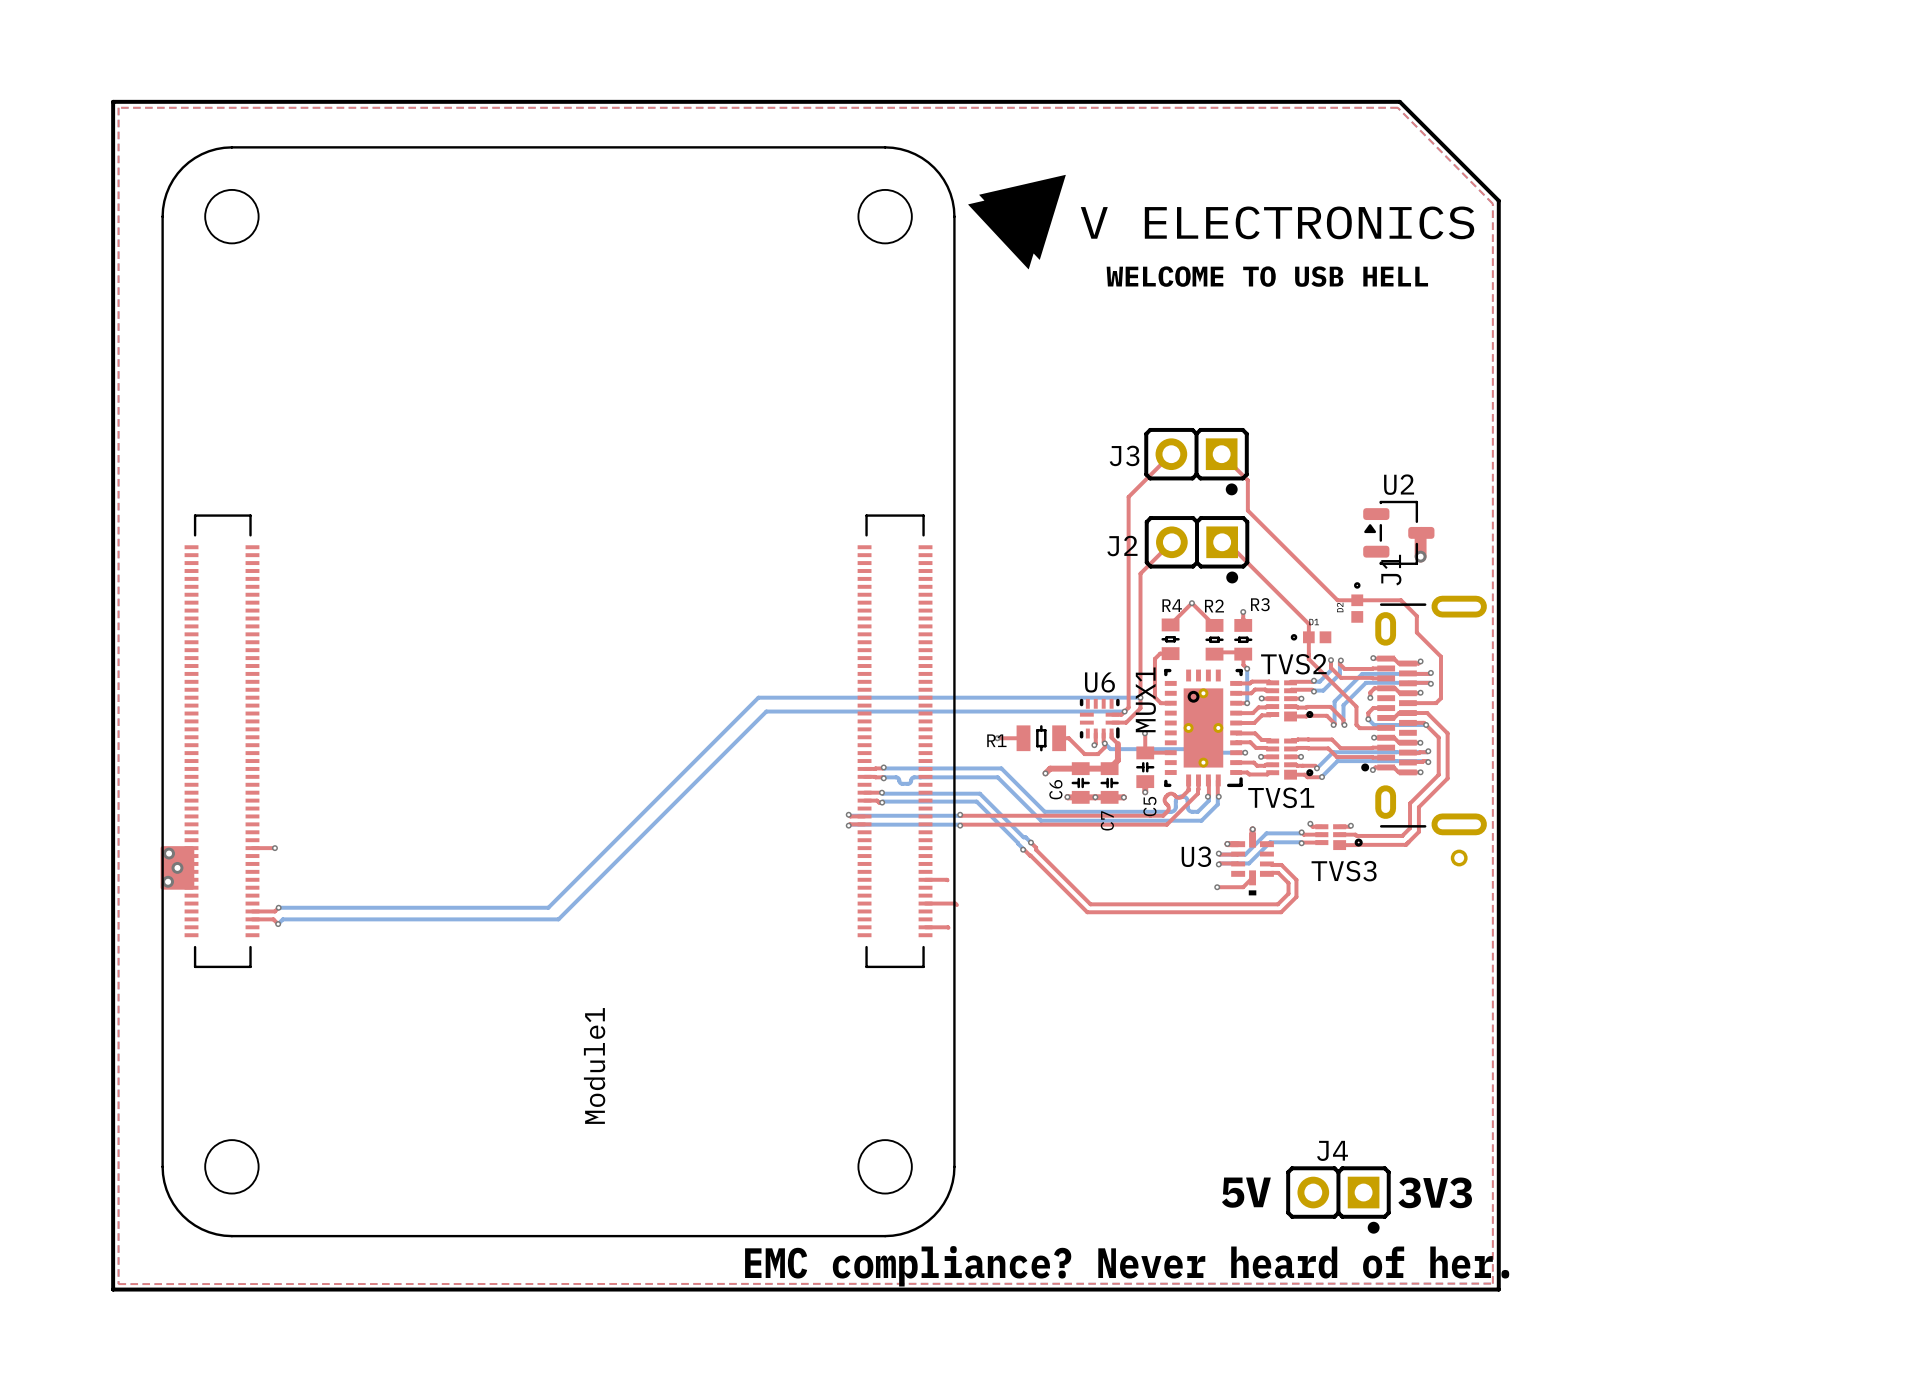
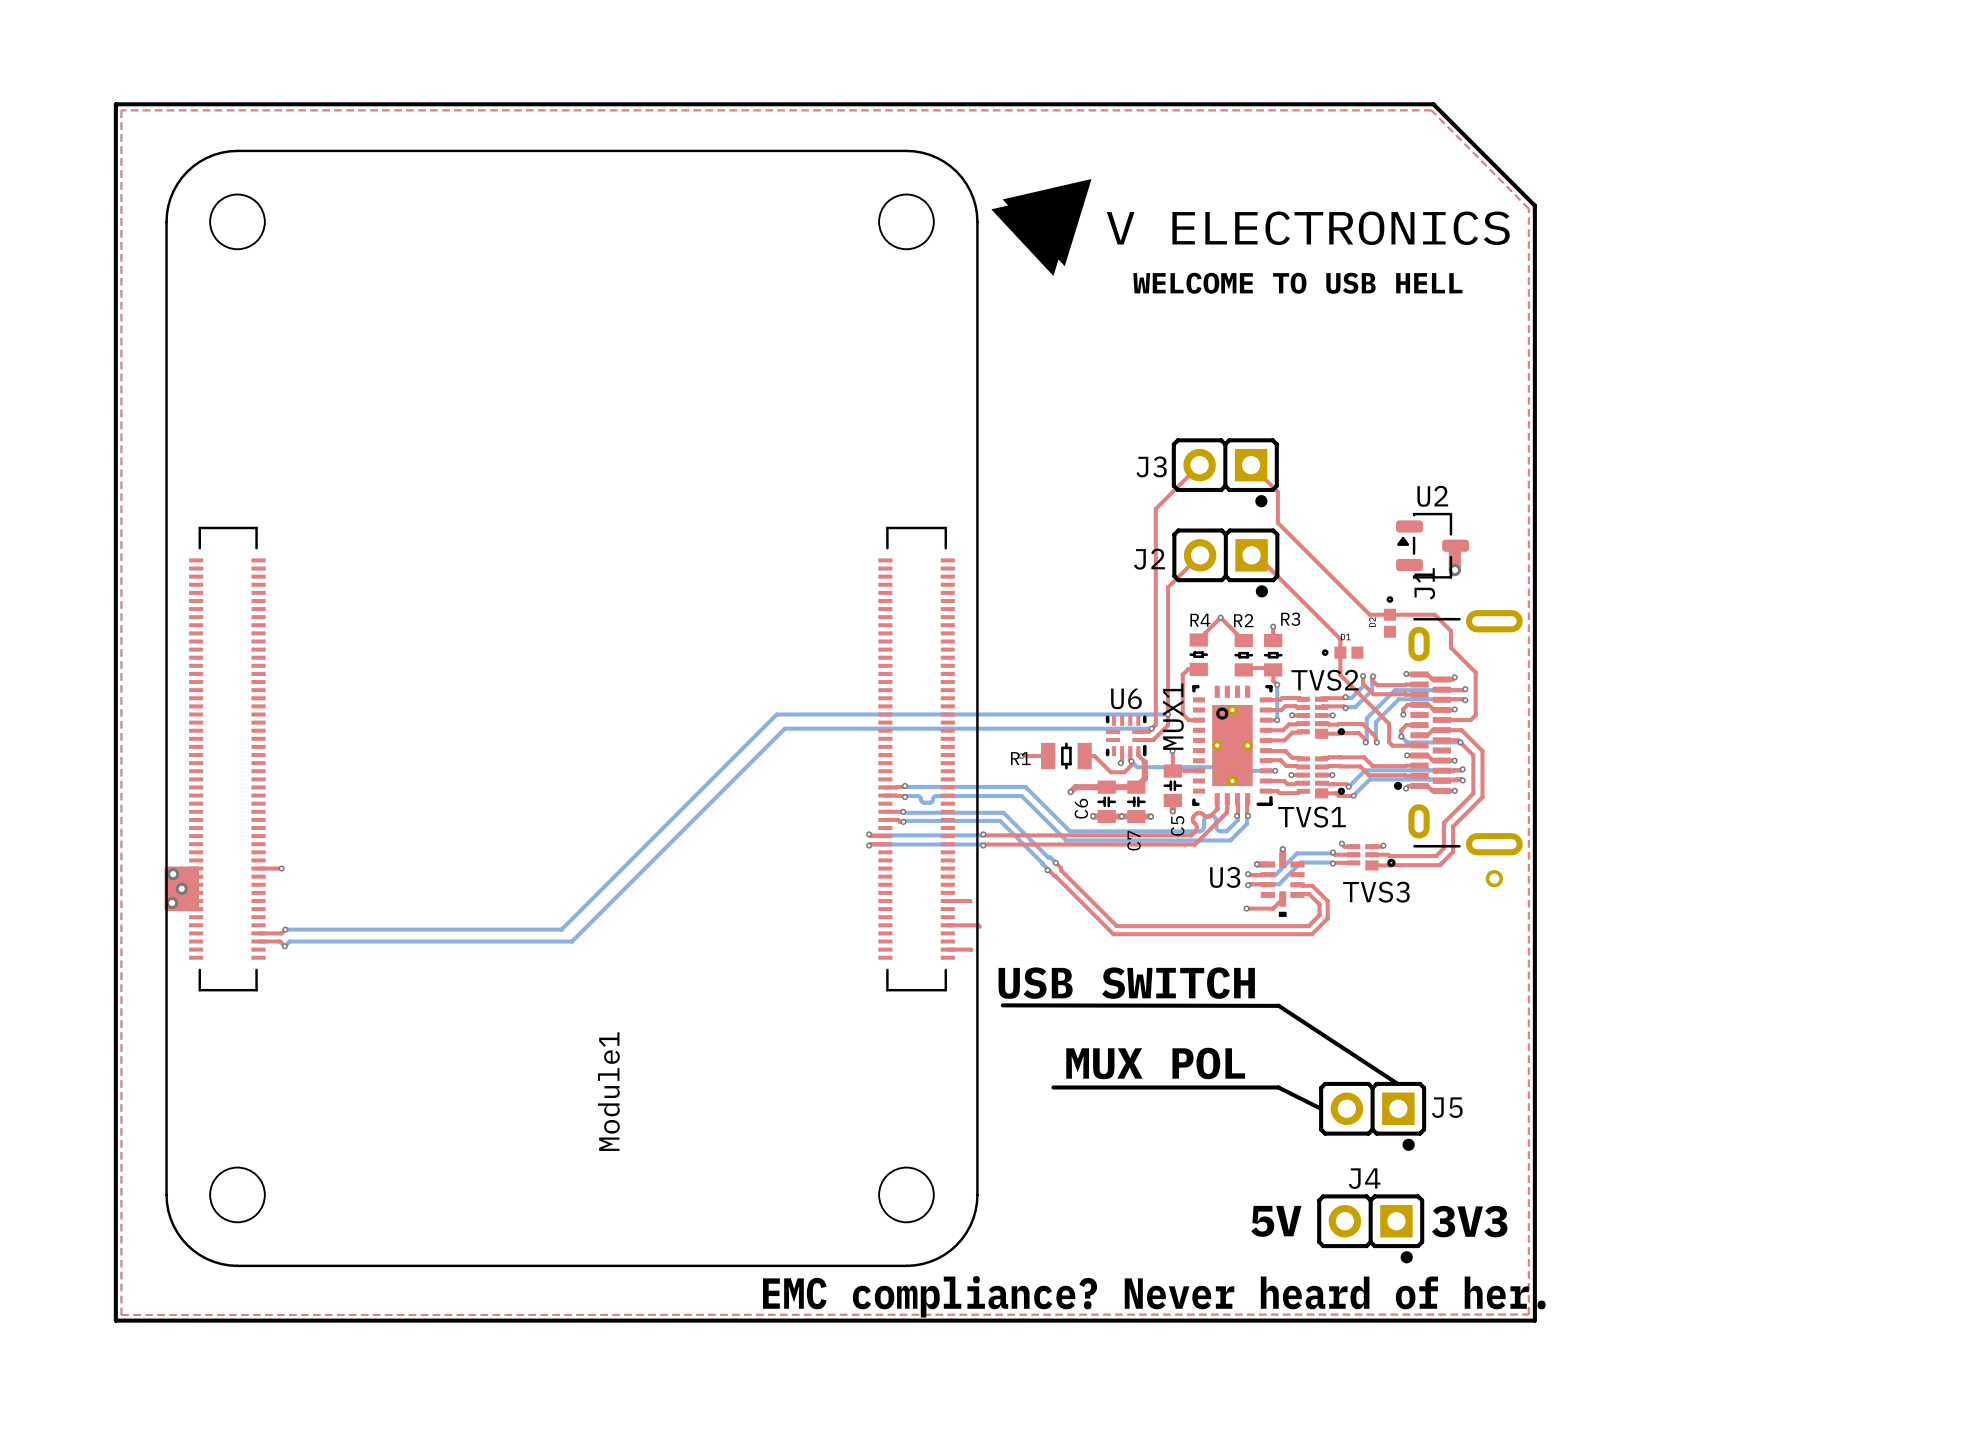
text: none -> USB SWITCH (1126, 983)
line: none -> (1002, 1005) (1278, 1005)
line: none -> (1278, 1005) (1397, 1083)
text: none -> MUX POL (1155, 1063)
line: none -> (1053, 1087) (1278, 1087) (1320, 1108)
J5: none -> (1372, 1116)

